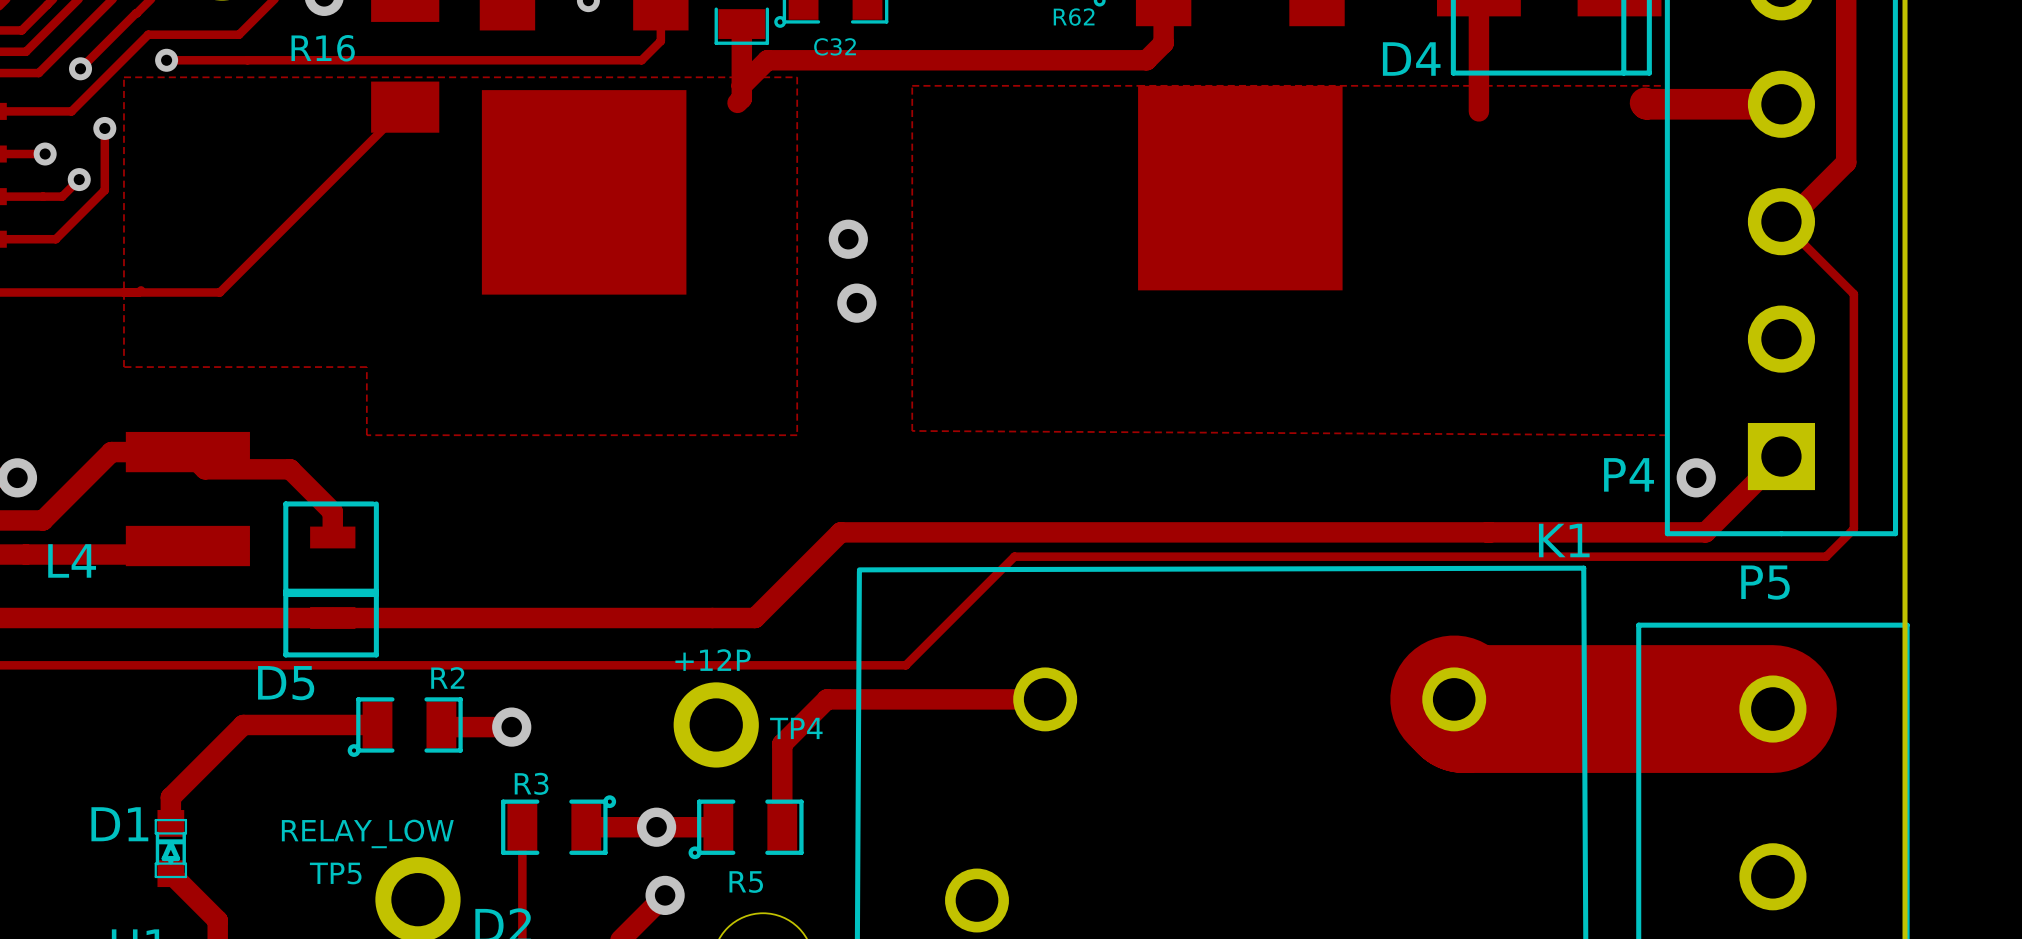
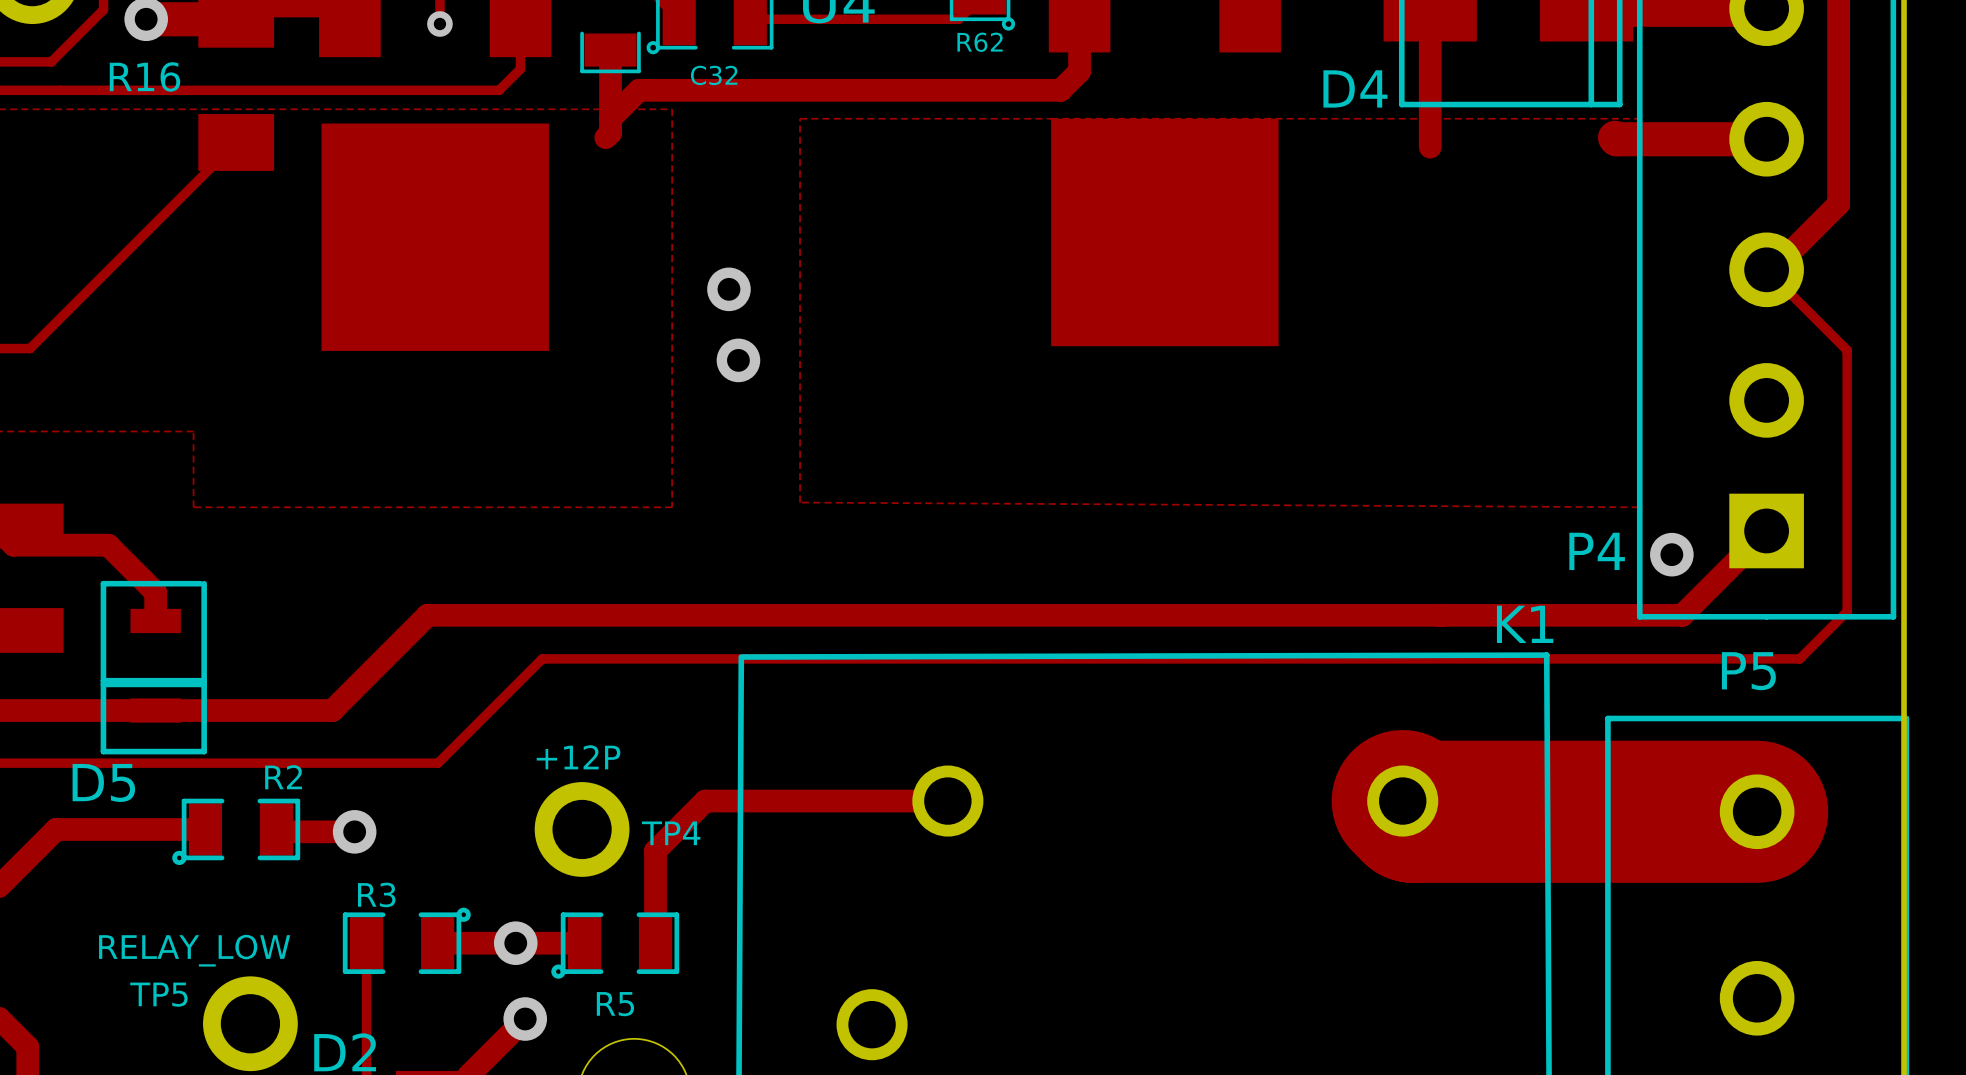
track: (840, 532) (755, 618) (491, 618) -> (720, 615) (427, 615) (332, 710)
track: (1826, 556) (1014, 556) (905, 665) (586, 665) -> (1816, 642) (1799, 658) (542, 658) (438, 763)

